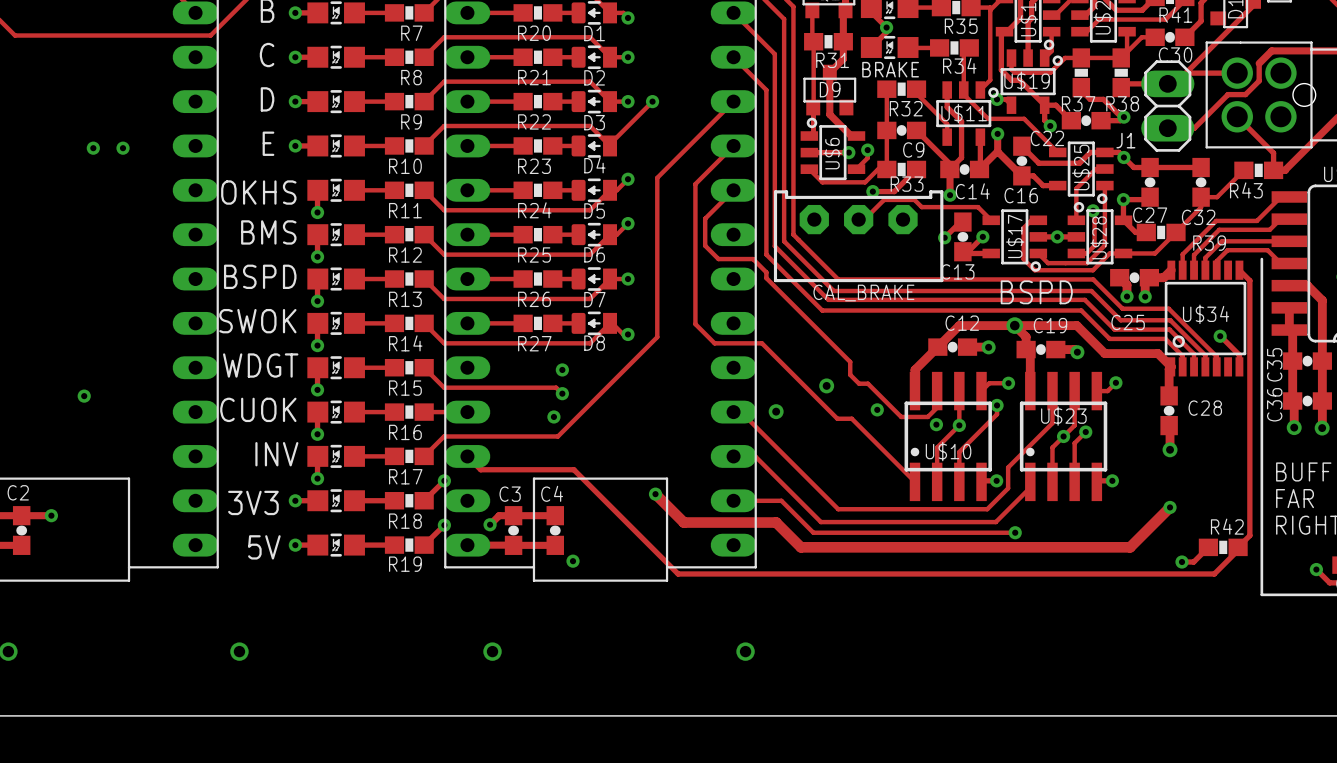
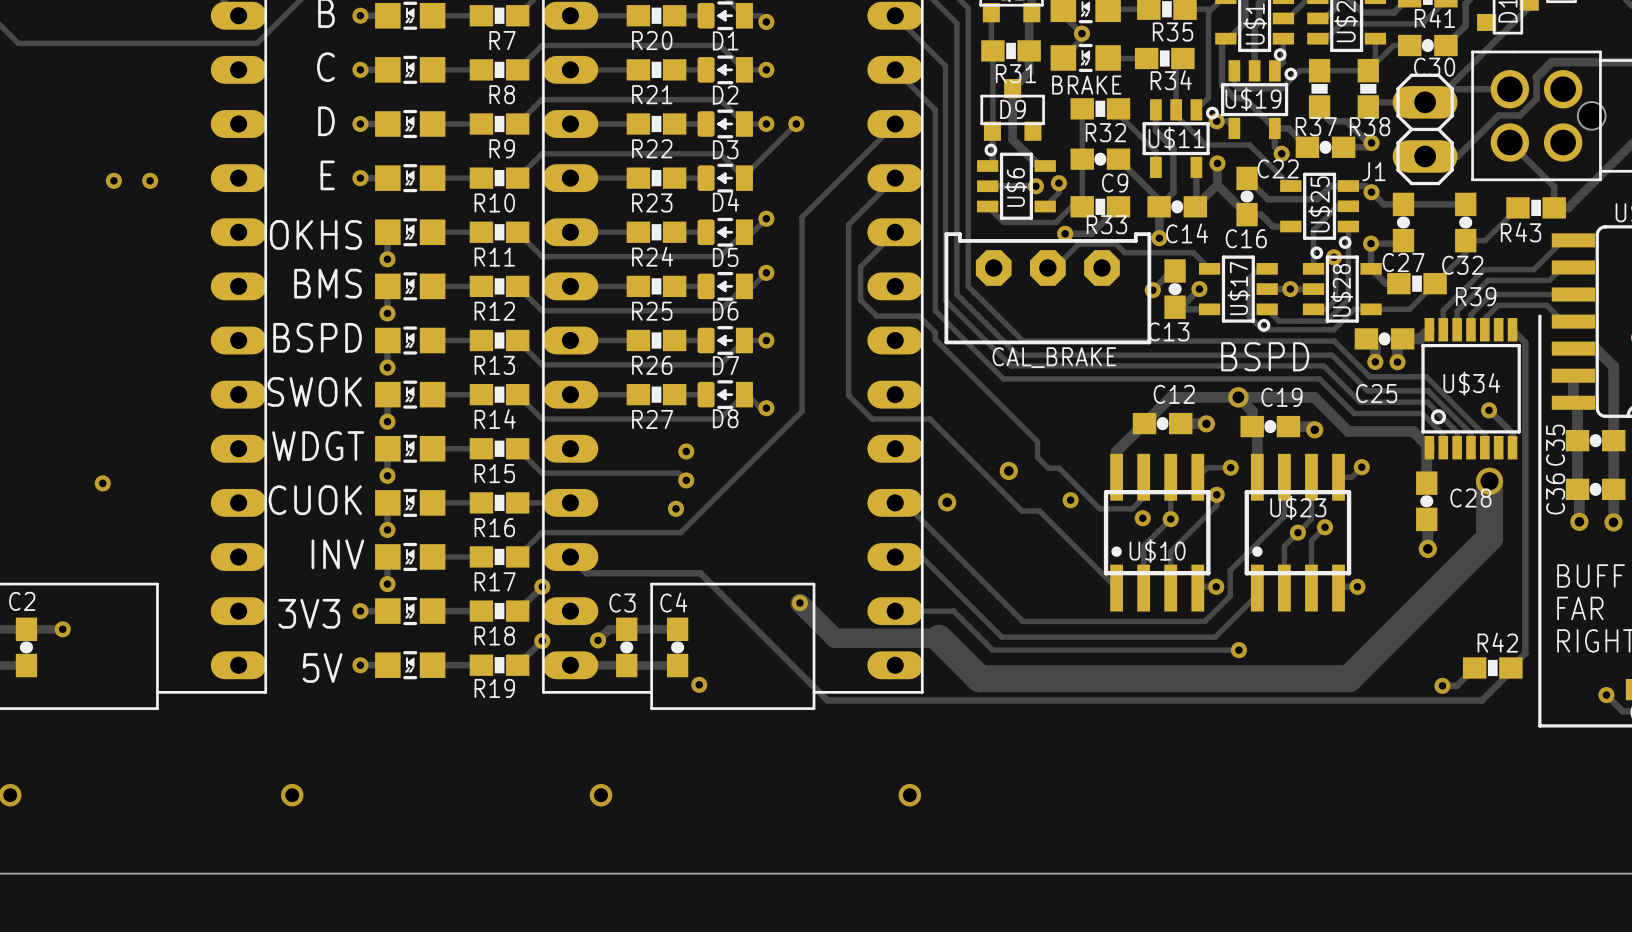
via: none -> (1489, 481)
track width: thin (655, 494) (683, 522) -> thick (799, 603) (834, 637)
track: (1170, 507) (1130, 547) (800, 547) (776, 522) (683, 522) -> (1489, 481) (1489, 538) (1348, 678) (979, 678) (939, 638) (834, 637)
via: (1170, 507) -> none

